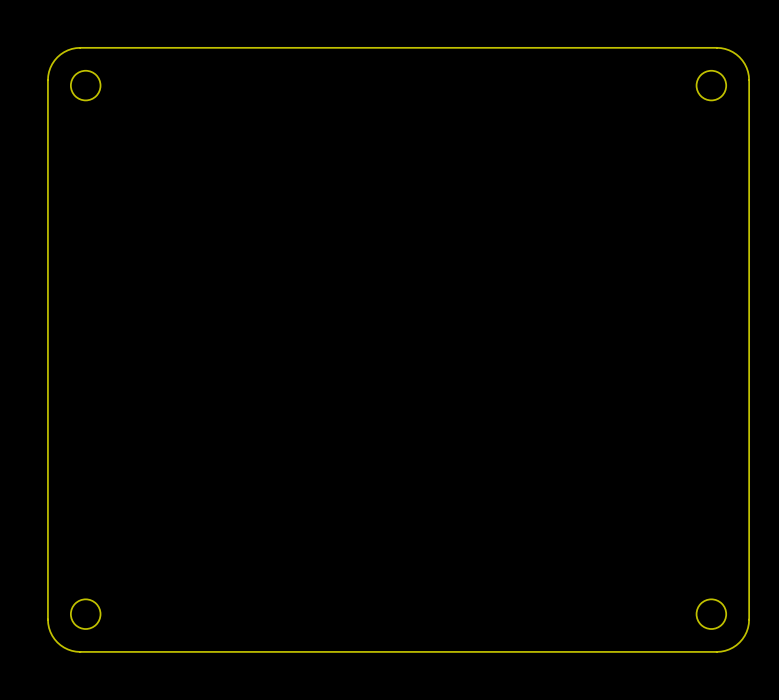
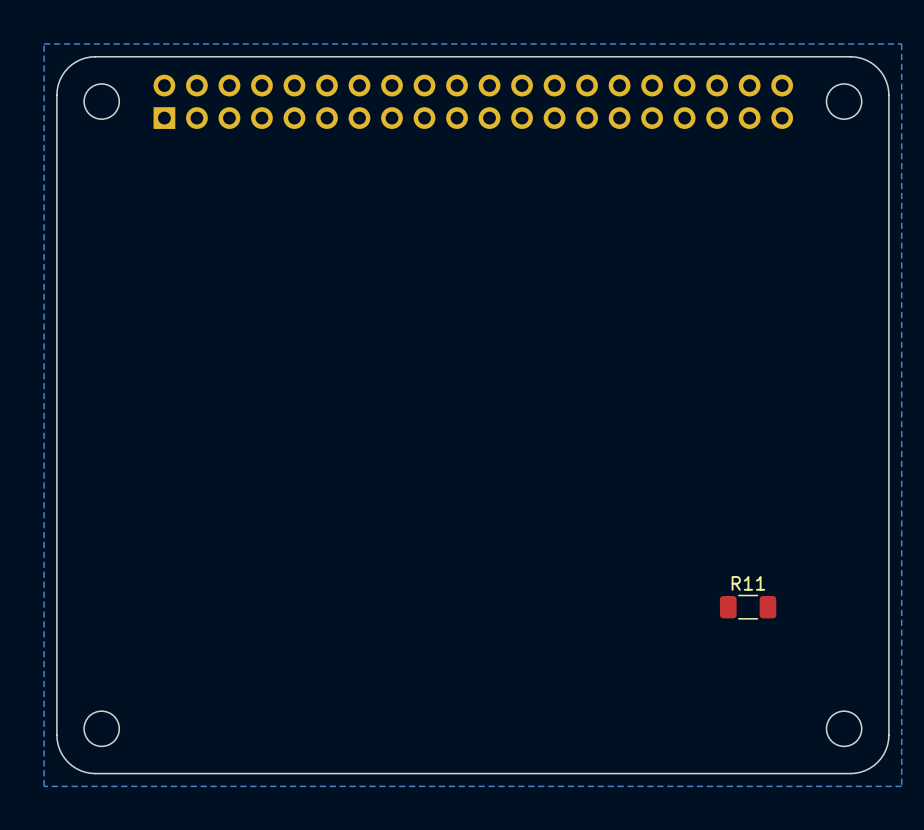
bottom zone outline: none -> (44, 43) (44, 786) (901, 786) (901, 43) (44, 43)
part: none -> (473, 101)
R11: none -> (748, 607)

